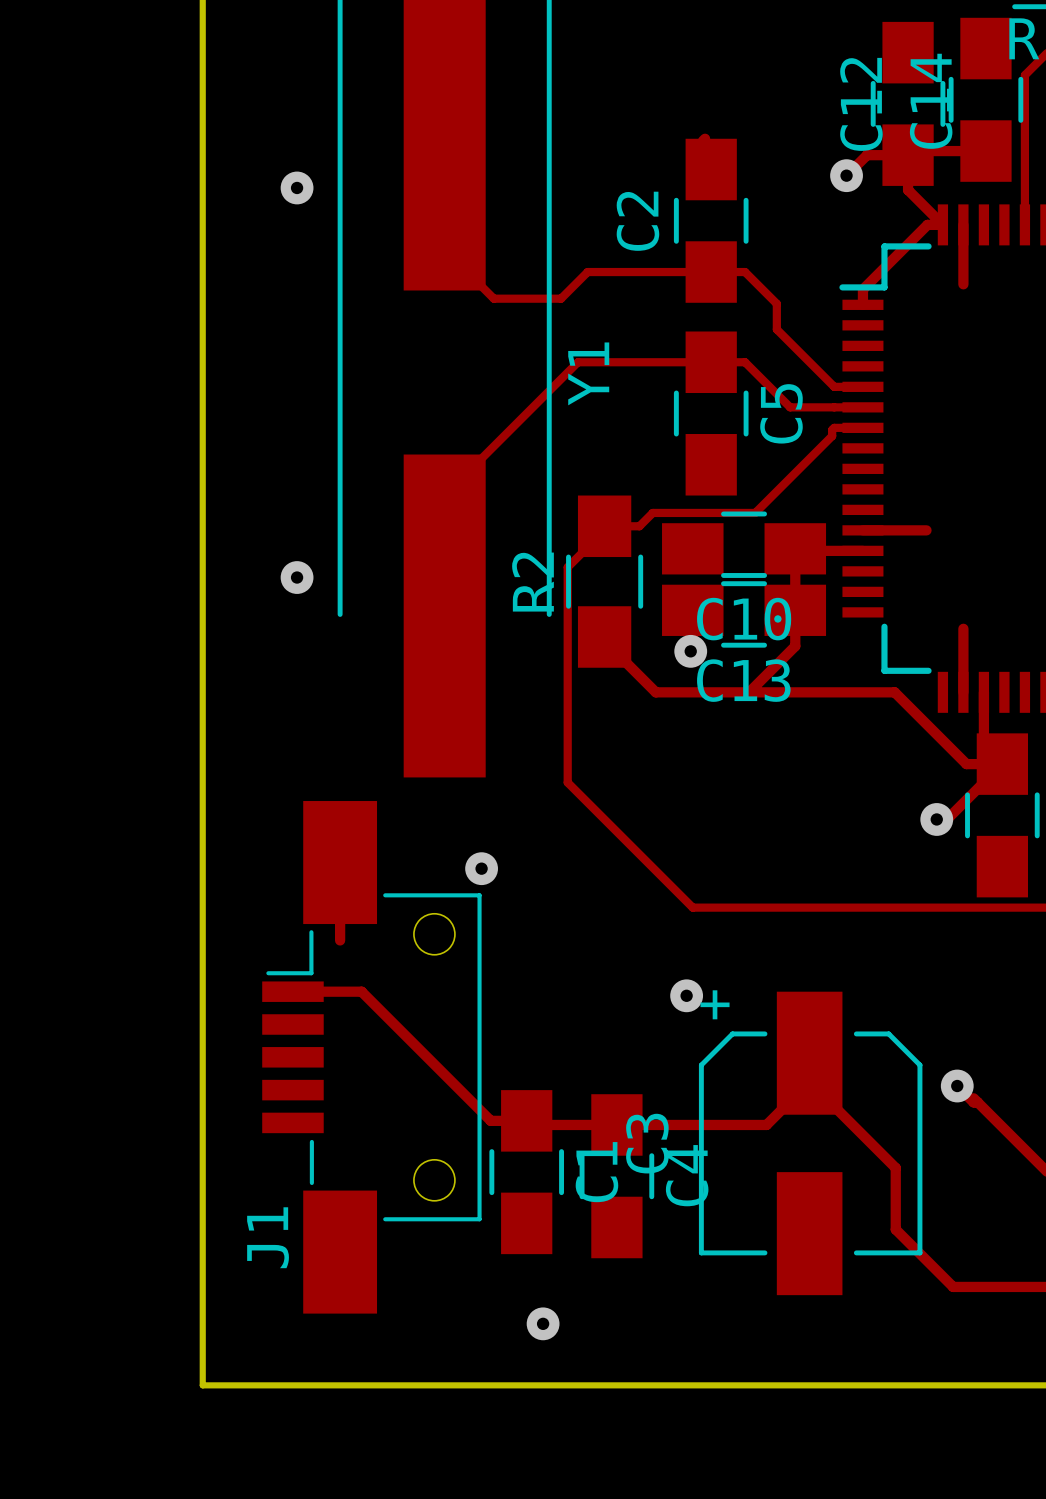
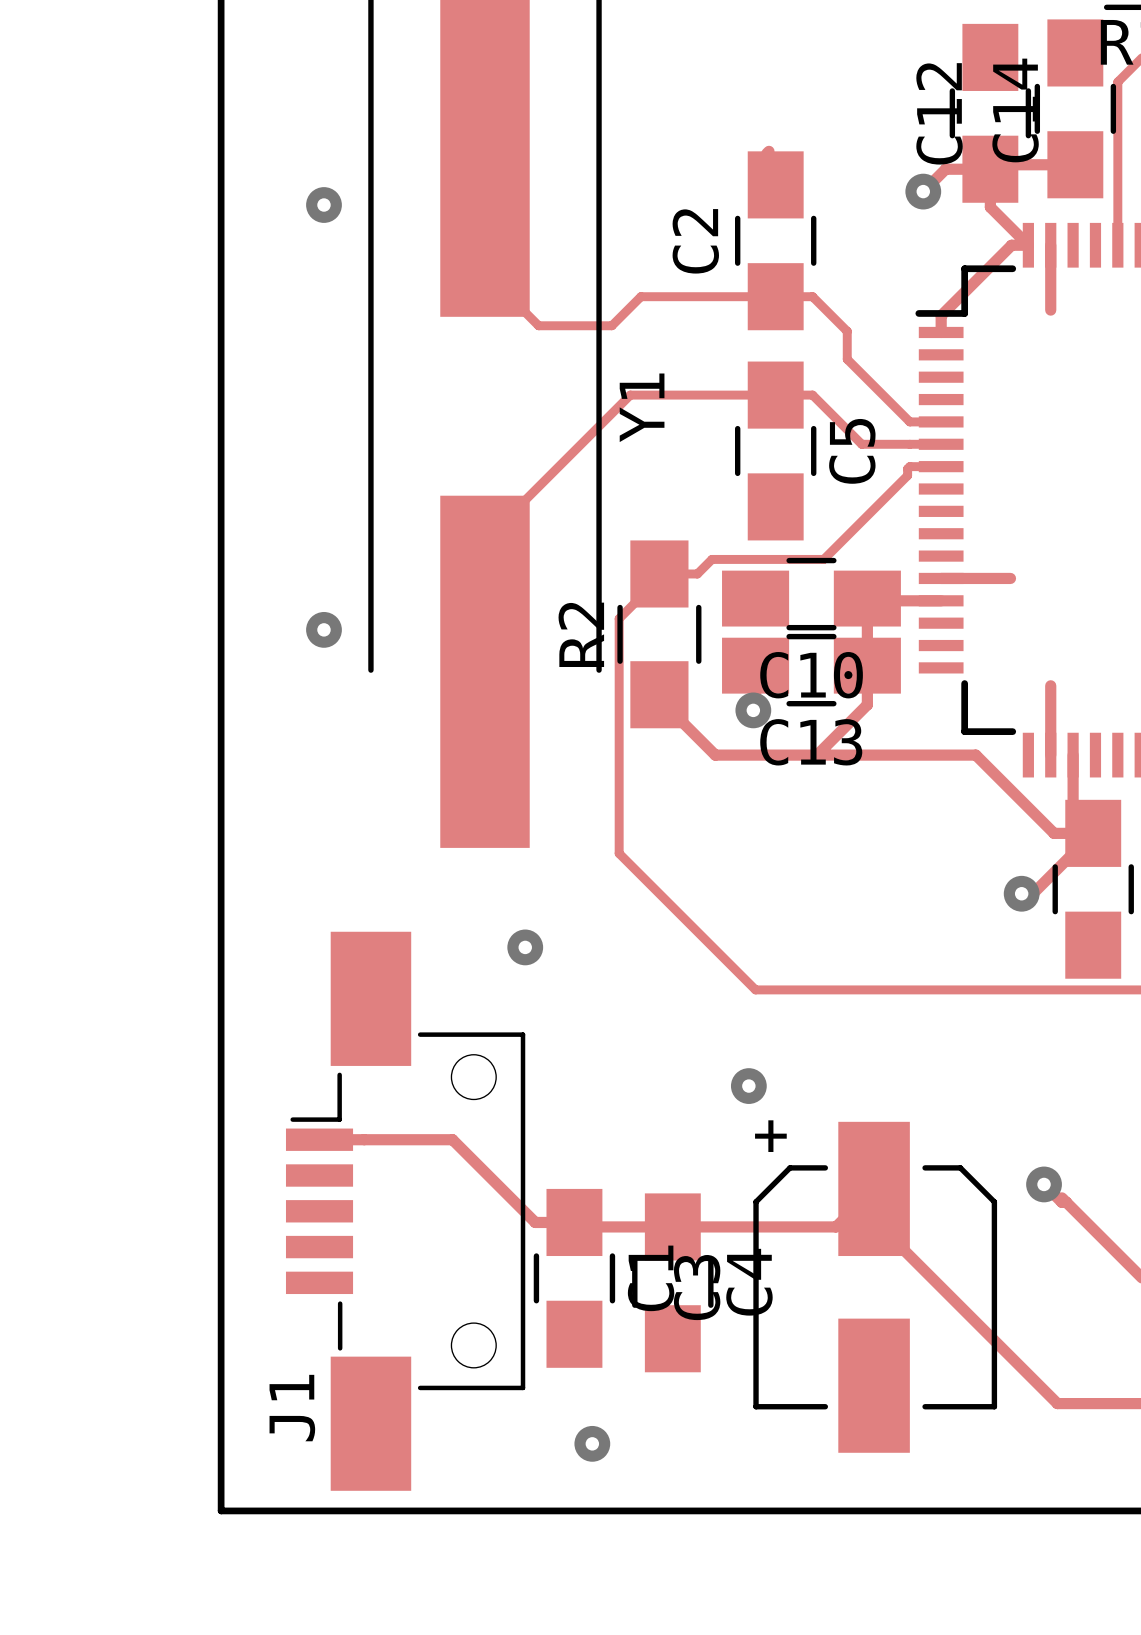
track: (292, 991) (361, 991) (414, 1045) -> (319, 1139) (452, 1139)
track: (809, 1053) (809, 1081) (895, 1168) (895, 1229) (953, 1286) (969, 1286) -> (874, 1188) (874, 1220) (1057, 1403)
J1 position: (371, 1057) -> (405, 1211)
C3 position: (810, 1143) -> (875, 1287)

